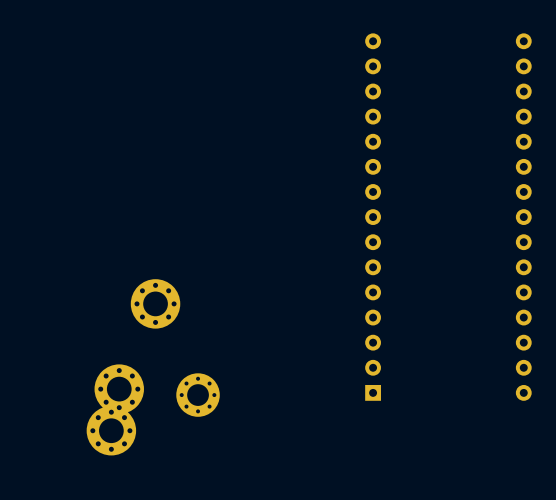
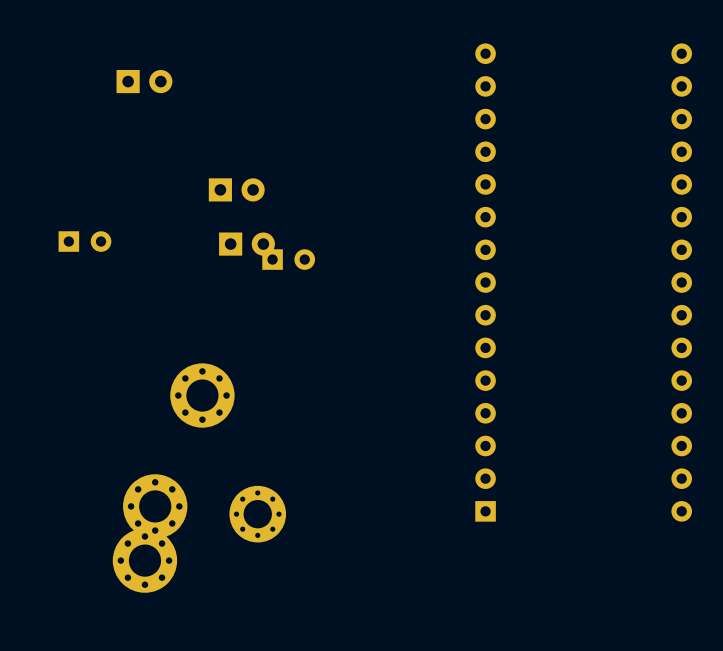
part: none -> (144, 81)
part: none -> (236, 189)
part: none -> (84, 241)
part: none -> (247, 244)
part: none -> (288, 259)

